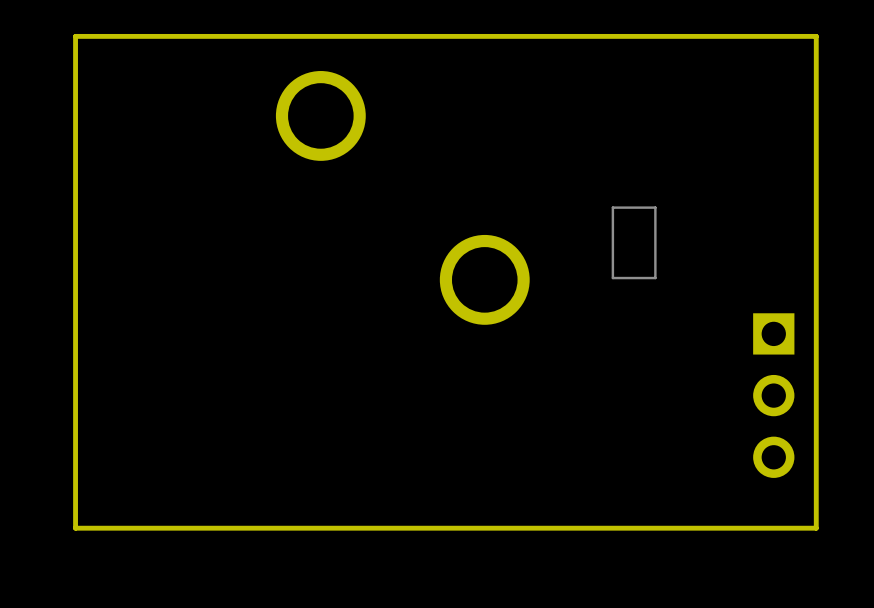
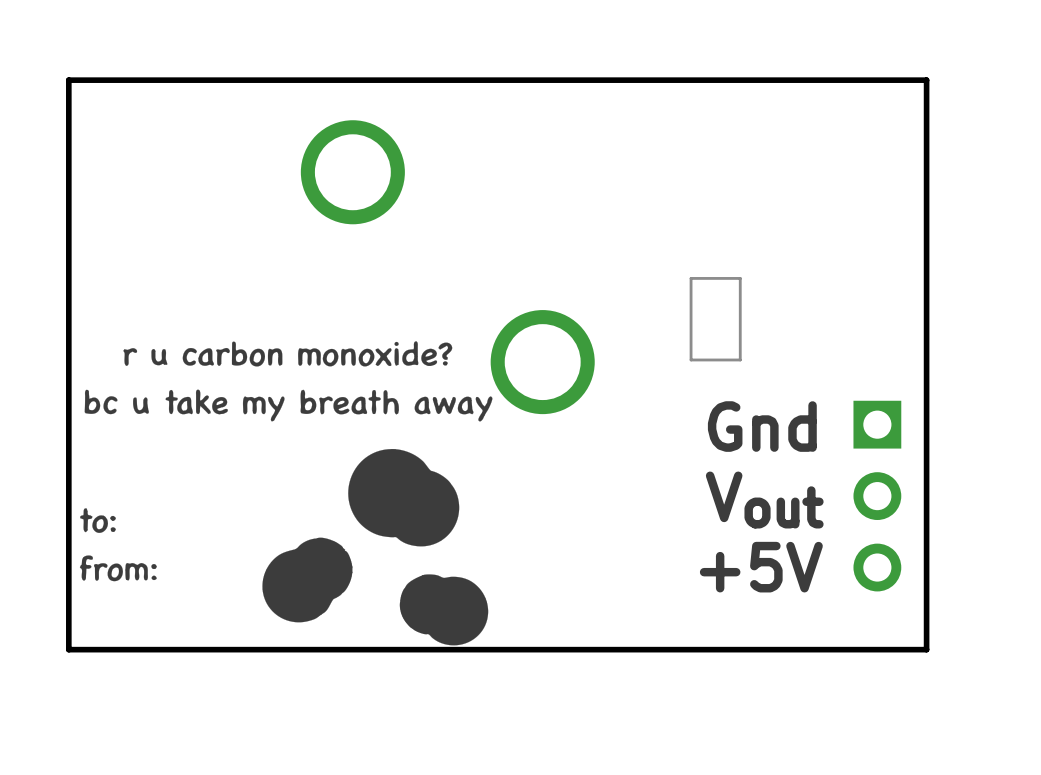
drawing: none -> [84, 341, 493, 422]
text: none -> Gnd (762, 426)
drawing: none -> [262, 449, 489, 646]
text: none -> Vout (764, 500)
drawing: none -> [79, 508, 157, 582]
text: none -> +5V (761, 567)

